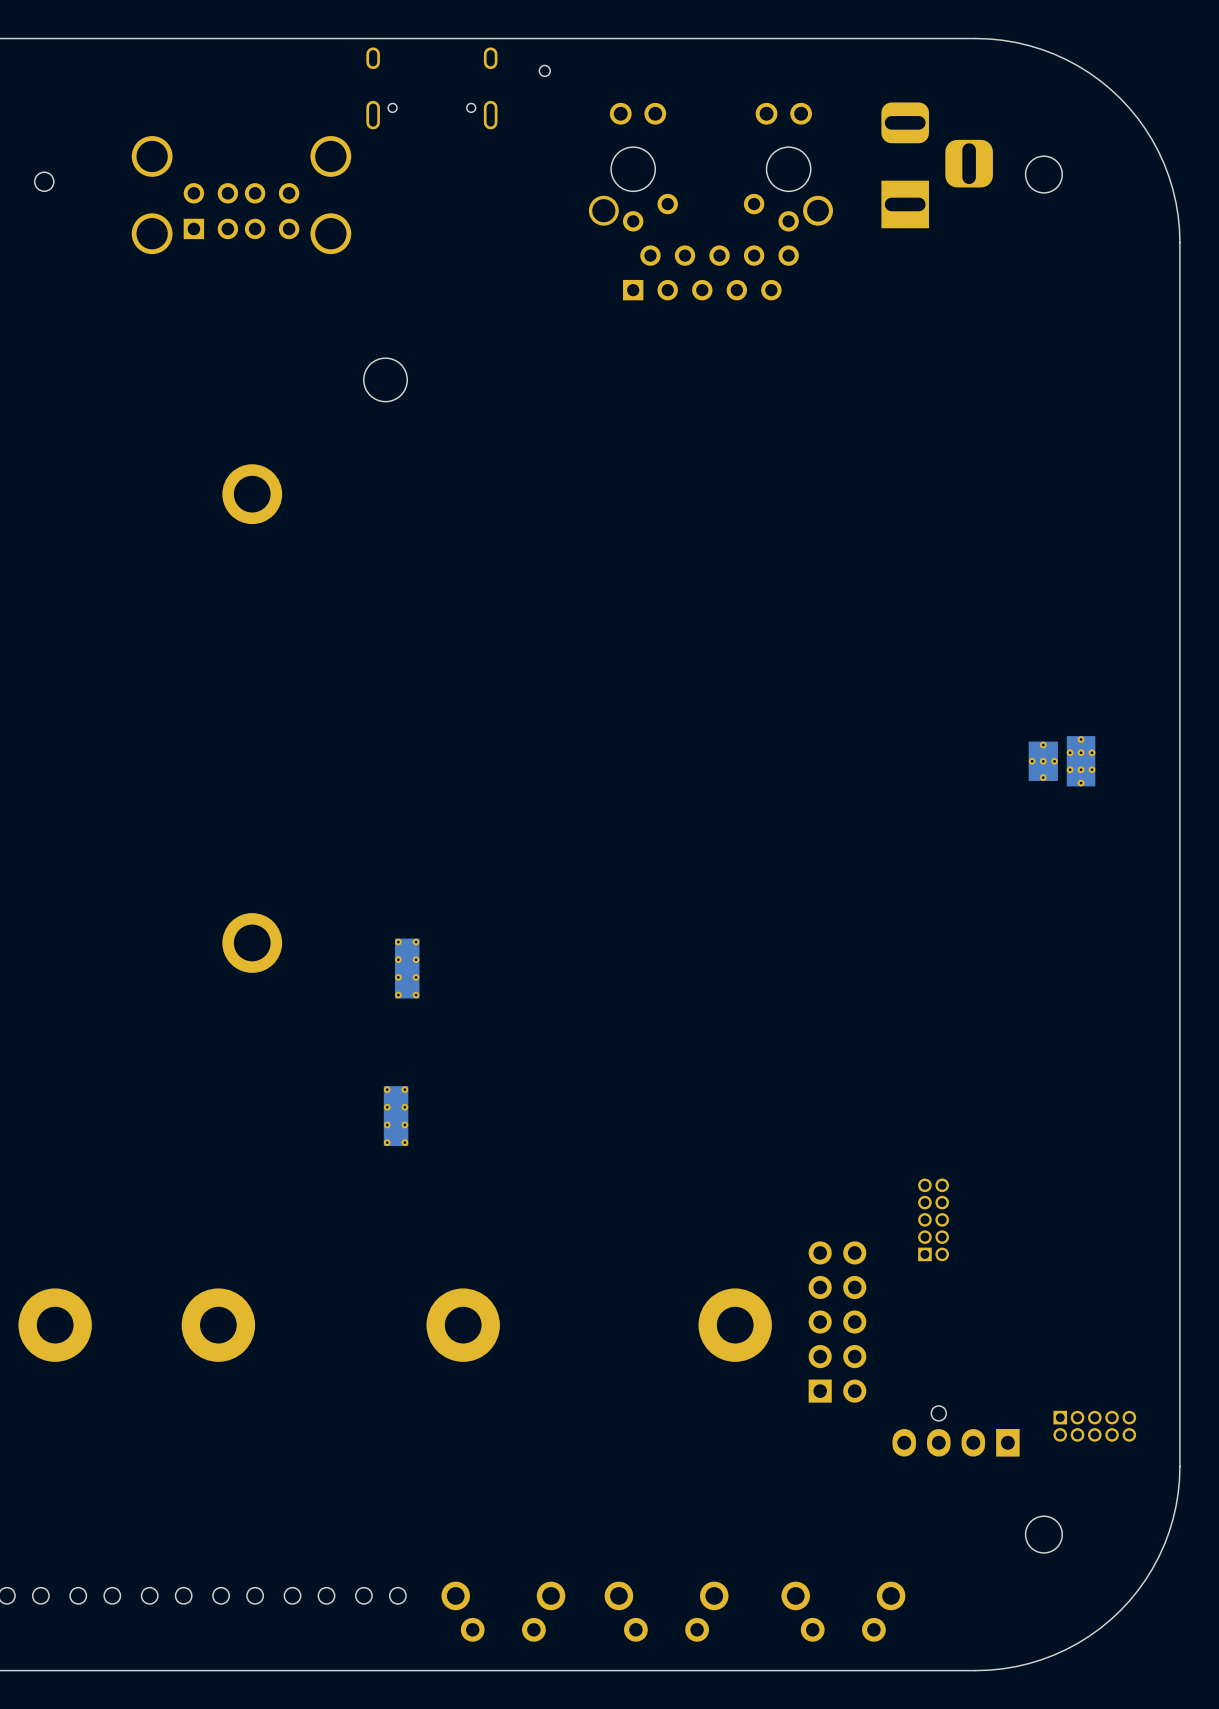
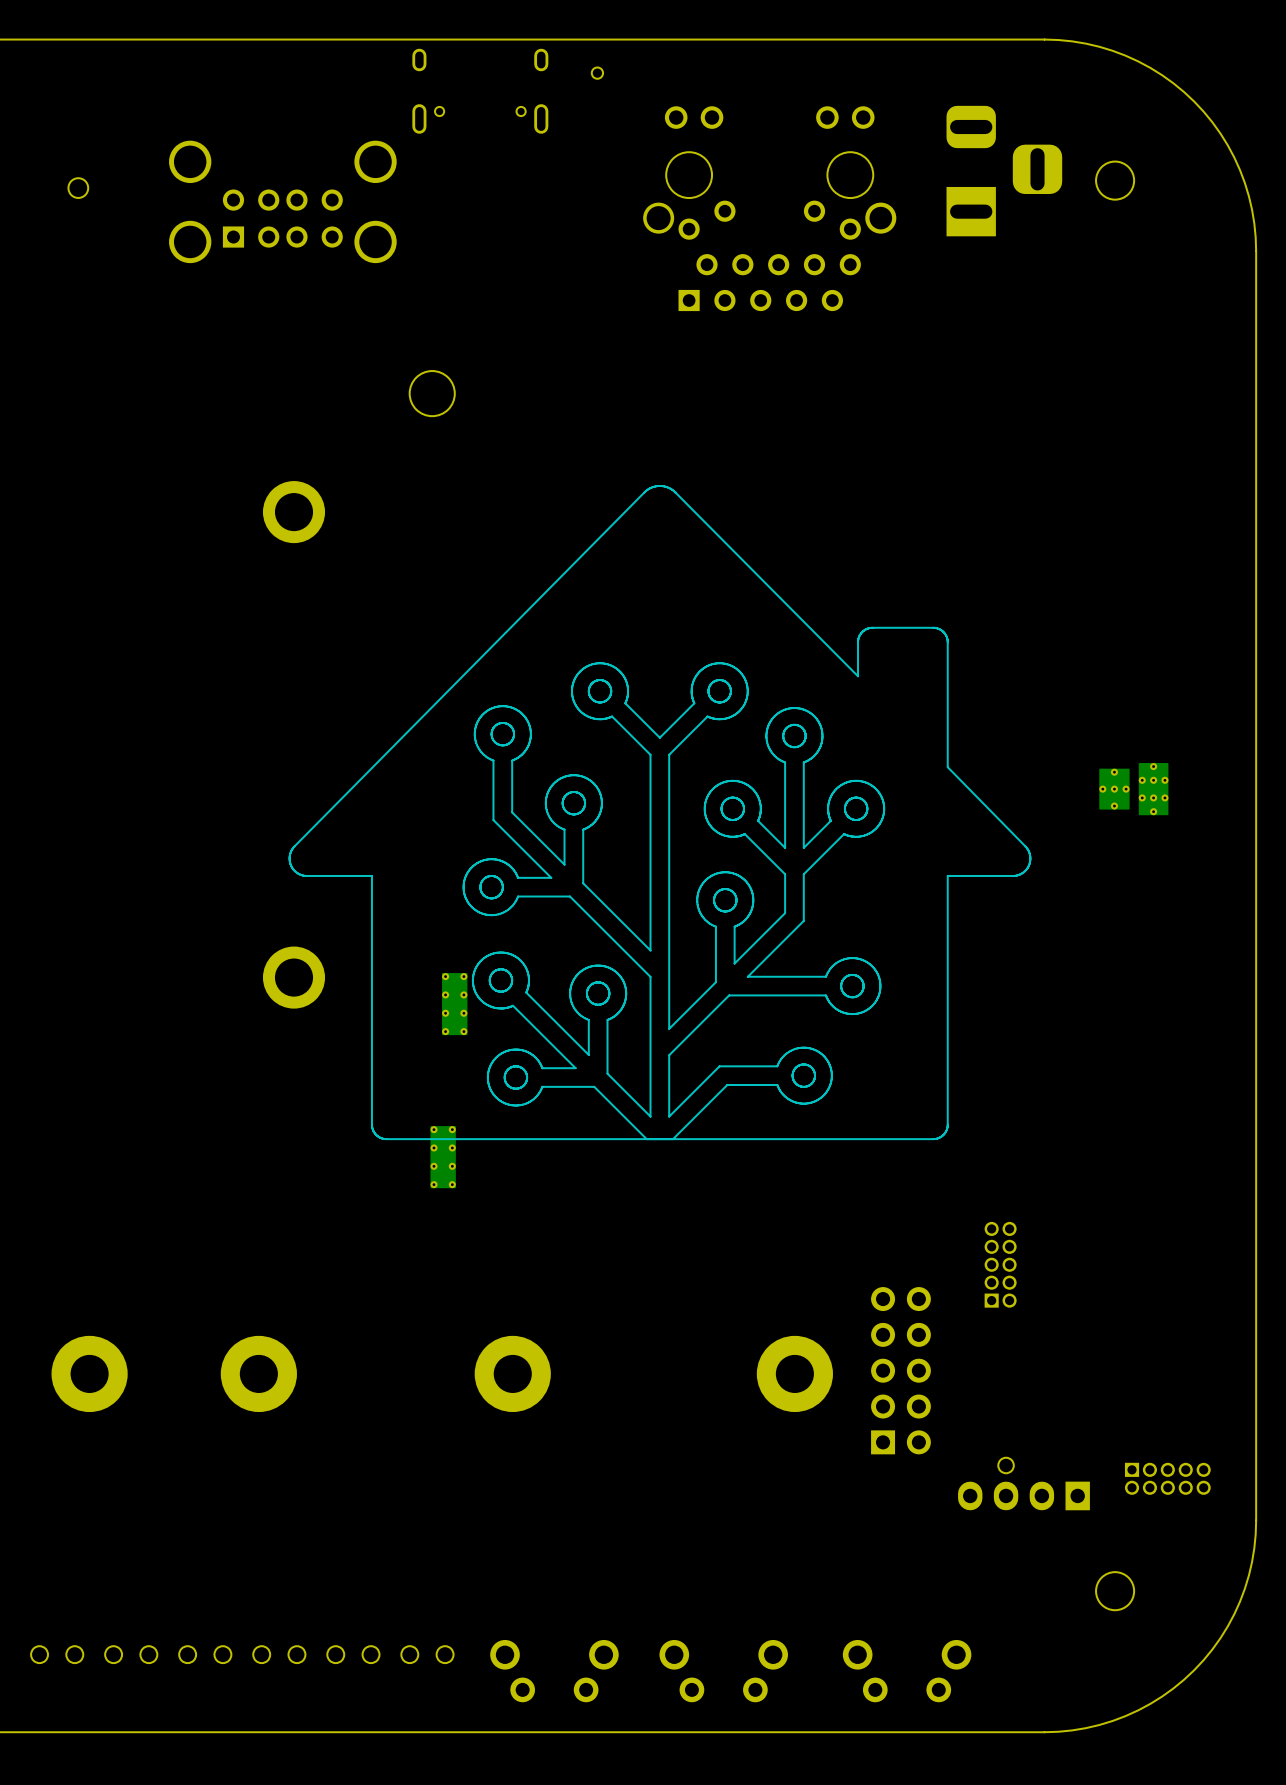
drawing: none -> [288, 485, 1032, 1141]

